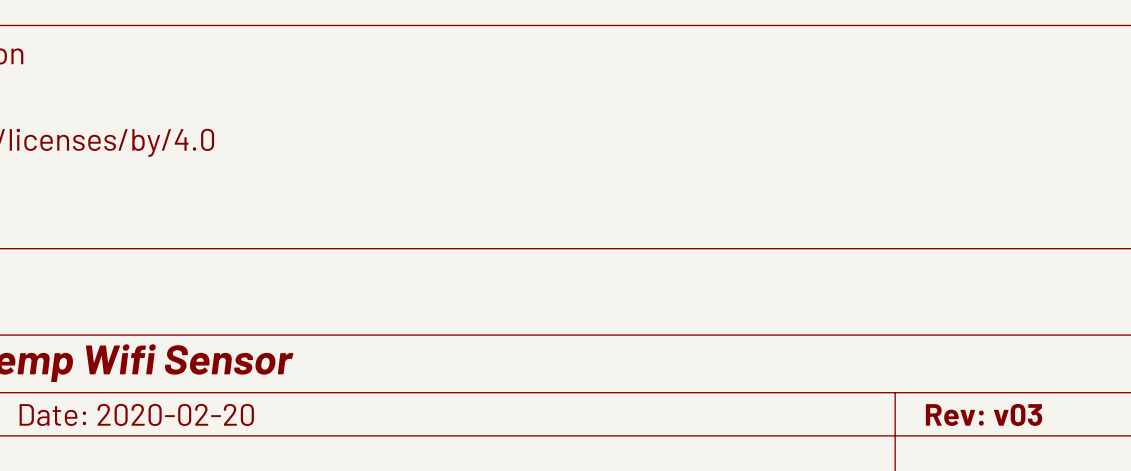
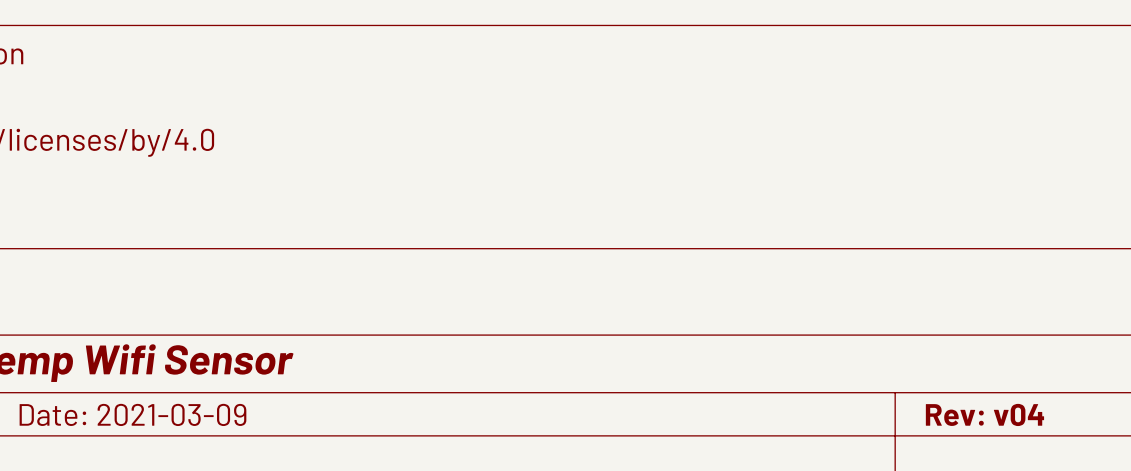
title block: Date: 2020-02-20 (136, 414) -> Date: 2021-03-09 (132, 414)
title block: Rev: v03 (984, 414) -> Rev: v04 (984, 414)

